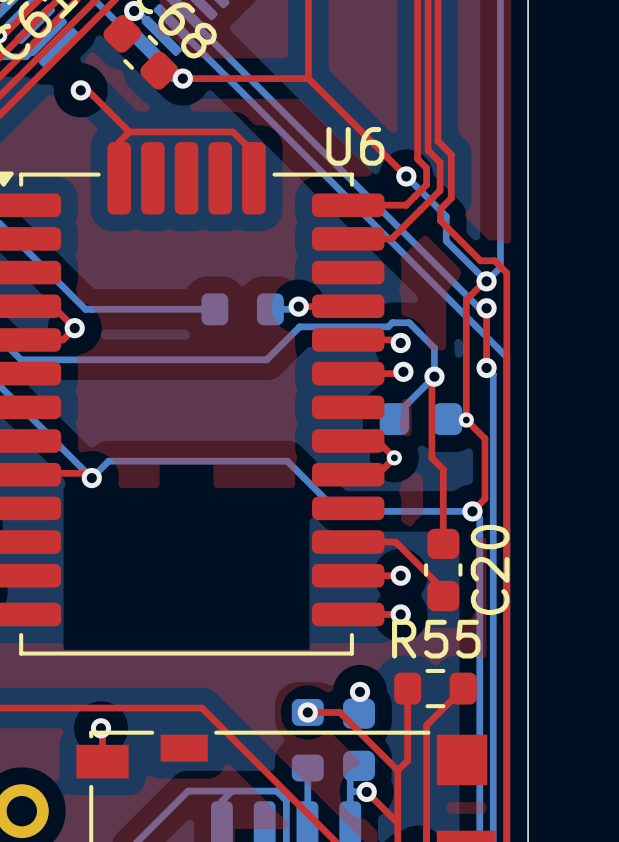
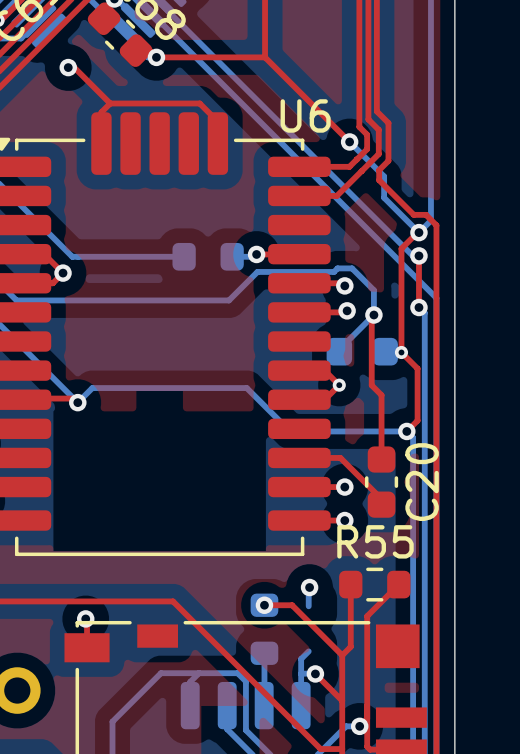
part: (358, 739) -> none

